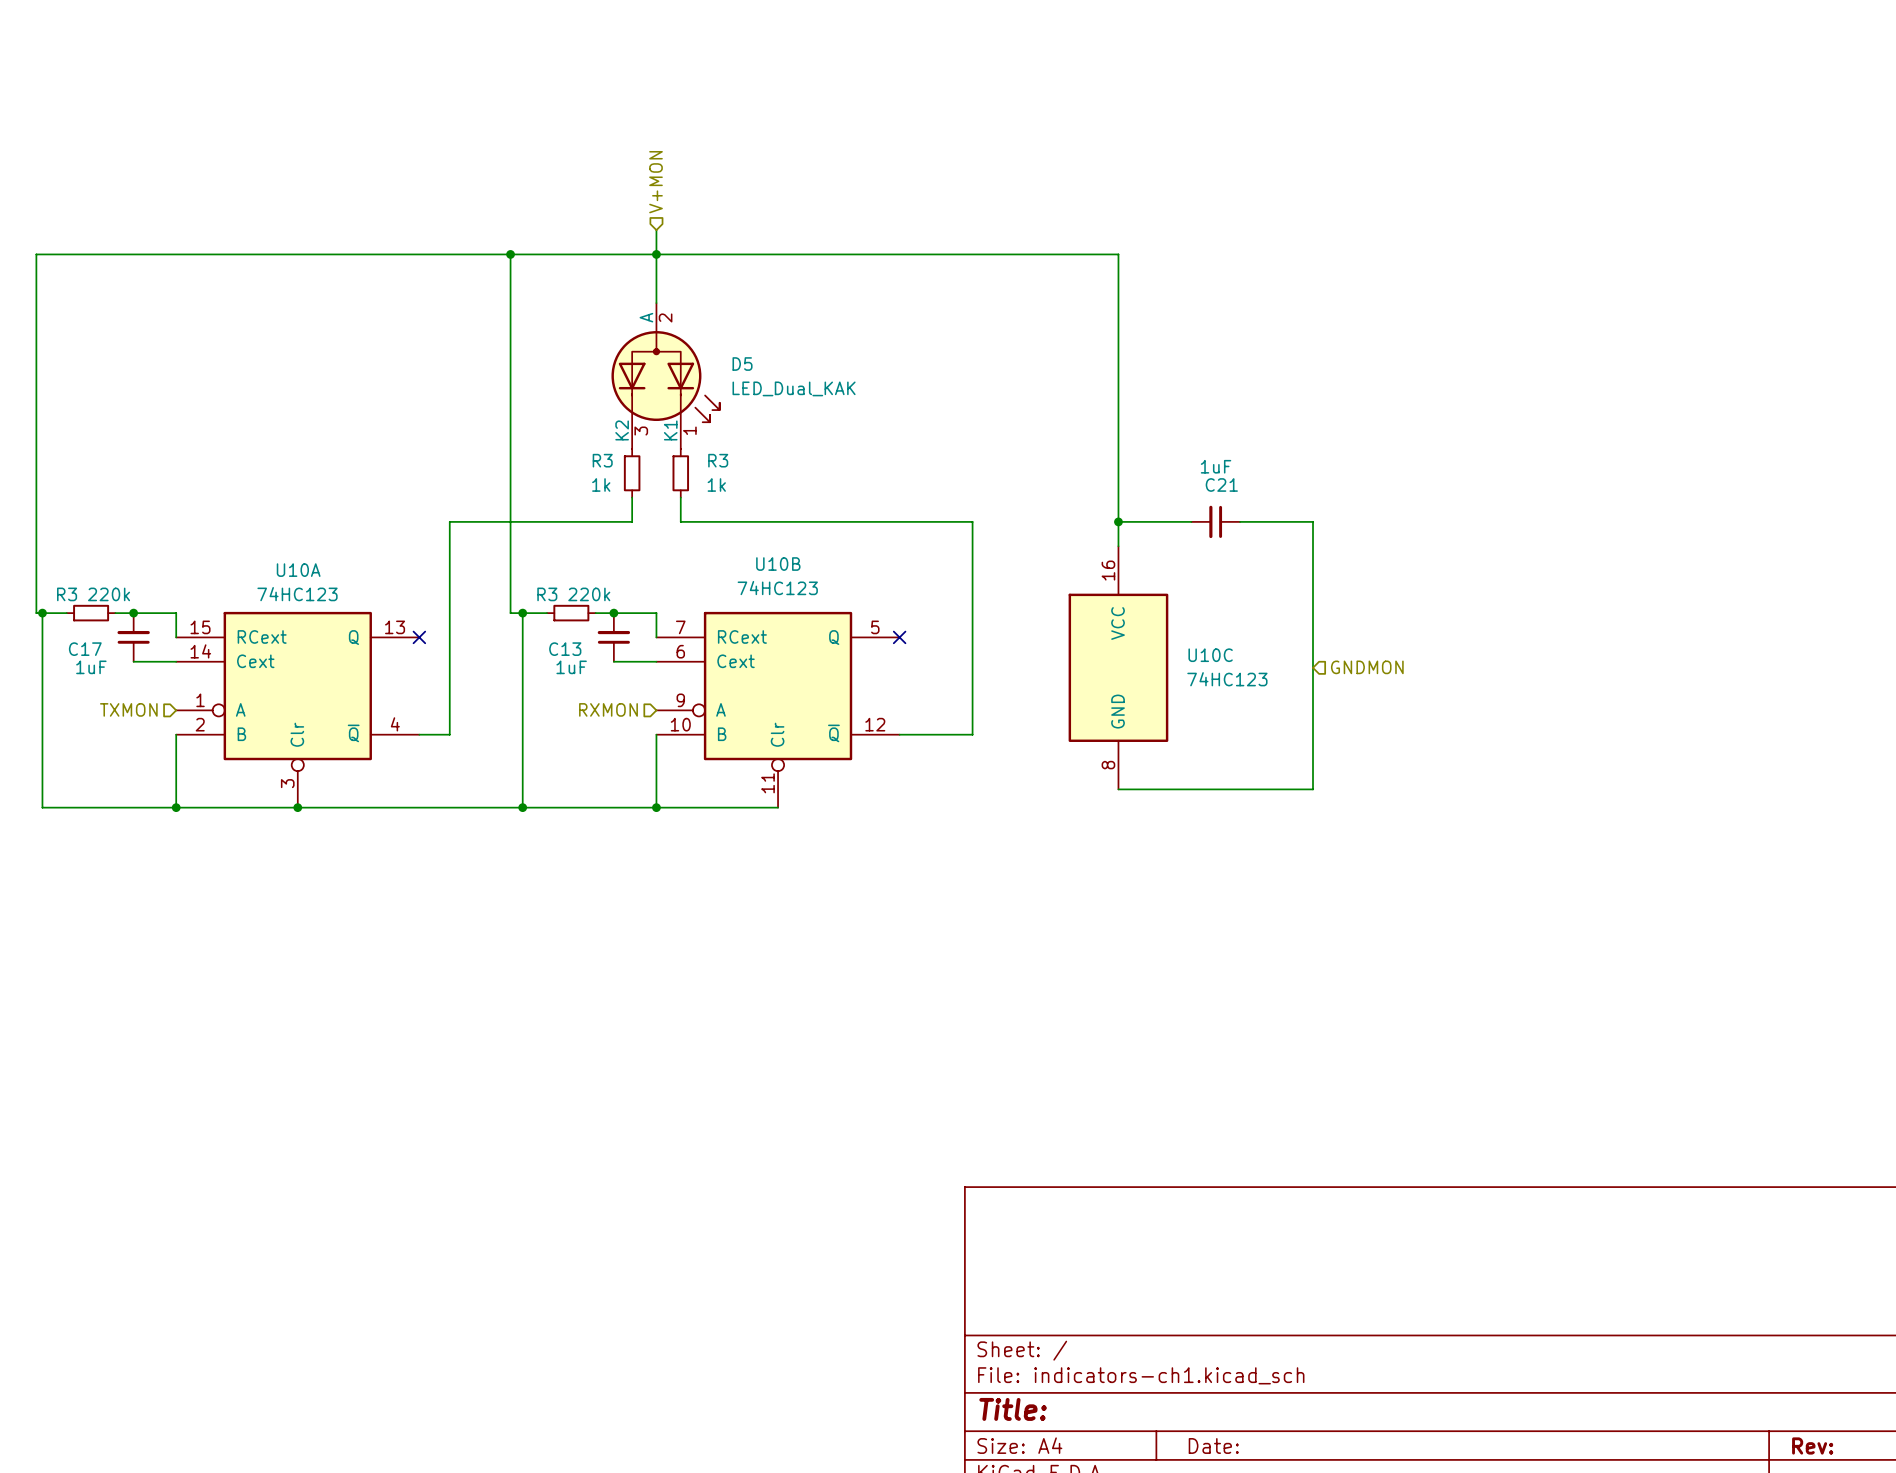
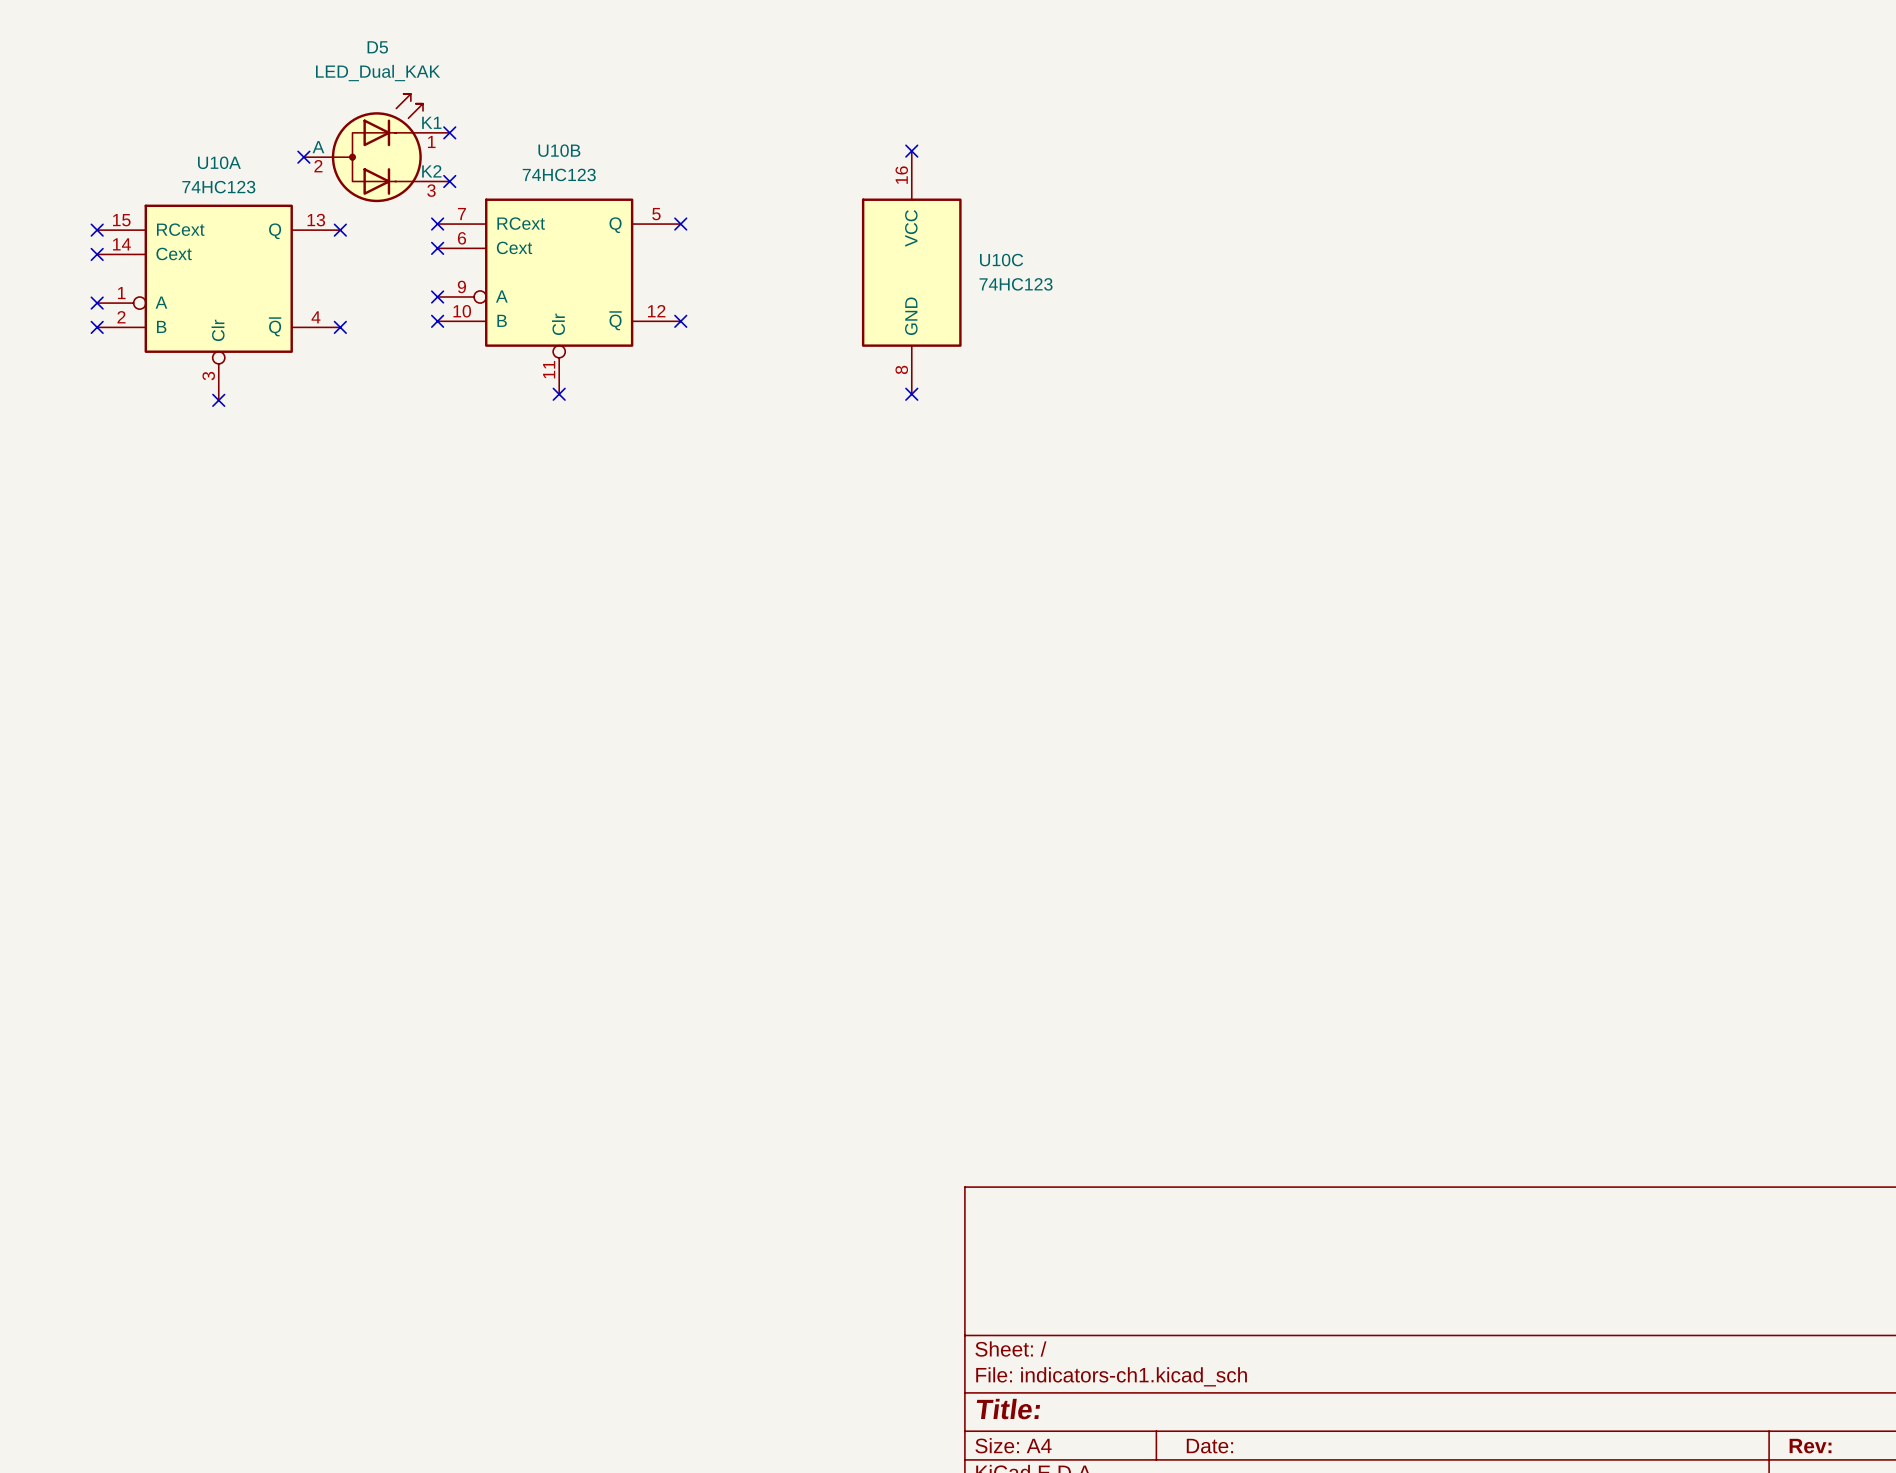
no-connect mark: none -> (449, 132)
no-connect mark: none -> (911, 151)
no-connect mark: none -> (303, 157)
no-connect mark: none -> (449, 181)
hierarchical label: V+MON (656, 182) -> none
no-connect mark: none -> (437, 224)
no-connect mark: none -> (680, 224)
no-connect mark: none -> (97, 230)
no-connect mark: none -> (340, 230)
wire: (656, 230) (656, 303) -> none
no-connect mark: none -> (437, 248)
no-connect mark: none -> (97, 254)
wire: (510, 254) (510, 613) (547, 613) -> none
junction: (510, 254) -> none
junction: (656, 254) -> none
no-connect mark: none -> (437, 296)
no-connect mark: none -> (97, 303)
no-connect mark: none -> (437, 321)
no-connect mark: none -> (680, 321)
no-connect mark: none -> (97, 327)
no-connect mark: none -> (340, 327)
D5 name position: D5 (742, 364) -> D5 (377, 47)
D5 rotation: 0° (665, 376) -> 90° counterclockwise (377, 148)
D5 position: (665, 376) -> (376, 148)
D5 value position: LED_Dual_KAK (794, 388) -> LED_Dual_KAK (378, 73)
no-connect mark: none -> (559, 394)
no-connect mark: none -> (911, 394)
no-connect mark: none -> (218, 400)
R3: 1k (632, 473) -> none
R3: 1k (680, 473) -> none
wire: (632, 497) (632, 521) (449, 521) (449, 734) (419, 734) -> none
wire: (680, 497) (680, 521) (972, 521) (972, 734) (899, 734) -> none
wire: (1118, 521) (1191, 521) -> none
junction: (1118, 521) -> none
C21: 1uF (1215, 521) -> none
wire: (1240, 521) (1313, 521) (1313, 789) (1118, 789) -> none
wire: (1118, 546) (1118, 254) (36, 254) (36, 613) (66, 613) -> none
wire: (42, 613) (42, 807) (778, 807) -> none
junction: (42, 613) -> none
R3: 220k (91, 613) -> none
wire: (115, 613) (176, 613) (176, 637) -> none
junction: (133, 613) -> none
wire: (522, 613) (522, 807) -> none
junction: (522, 613) -> none
R3: 220k (571, 613) -> none
wire: (595, 613) (656, 613) (656, 637) -> none
junction: (613, 613) -> none
C17: 1uF (133, 637) -> none
no-connect mark: (419, 637) -> none
C13: 1uF (613, 637) -> none
no-connect mark: (899, 637) -> none
wire: (133, 661) (176, 661) -> none
wire: (613, 661) (656, 661) -> none
U10C position: (1118, 667) -> (911, 272)
hierarchical label: GNDMON (1367, 667) -> none
hierarchical label: TXMON (128, 709) -> none
U10A position: (297, 709) -> (218, 302)
hierarchical label: RXMON (608, 709) -> none
U10B position: (778, 709) -> (559, 296)
wire: (176, 734) (176, 807) -> none
wire: (656, 734) (656, 807) -> none
junction: (176, 807) -> none
junction: (297, 807) -> none
junction: (522, 807) -> none
junction: (656, 807) -> none

